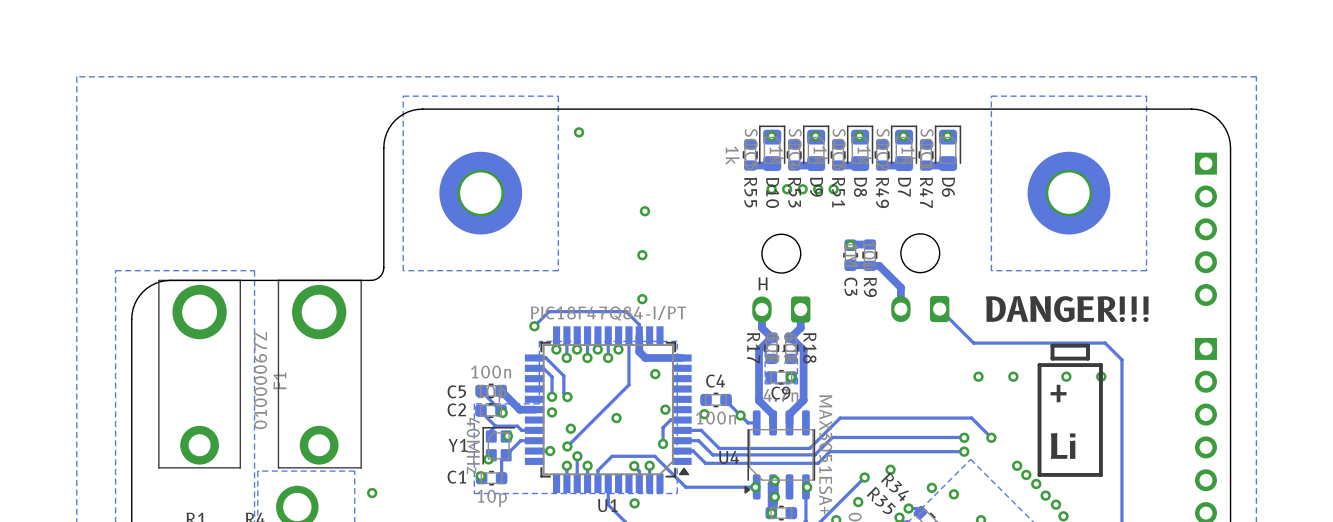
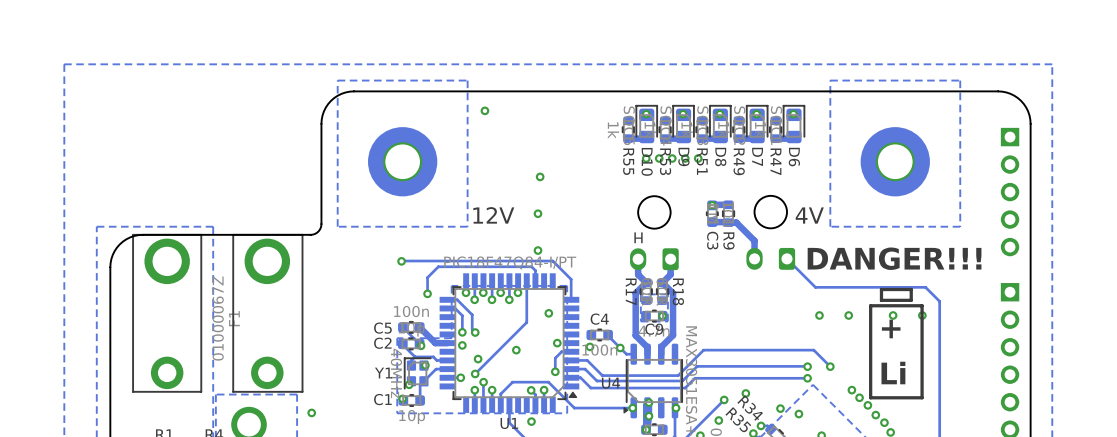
text: none -> 12V (493, 215)
text: none -> 4V (809, 215)
track: (549, 311) (534, 326) -> (459, 261) (401, 261)
track: (626, 311) (639, 324) -> (427, 293) (427, 277) (438, 266) (531, 266) (535, 271)
via: none -> (401, 261)
via: (534, 326) -> none
track: (639, 335) (639, 351) (645, 357) (681, 357) -> (524, 261) (552, 261) (571, 279) (571, 299)
via: none -> (427, 293)

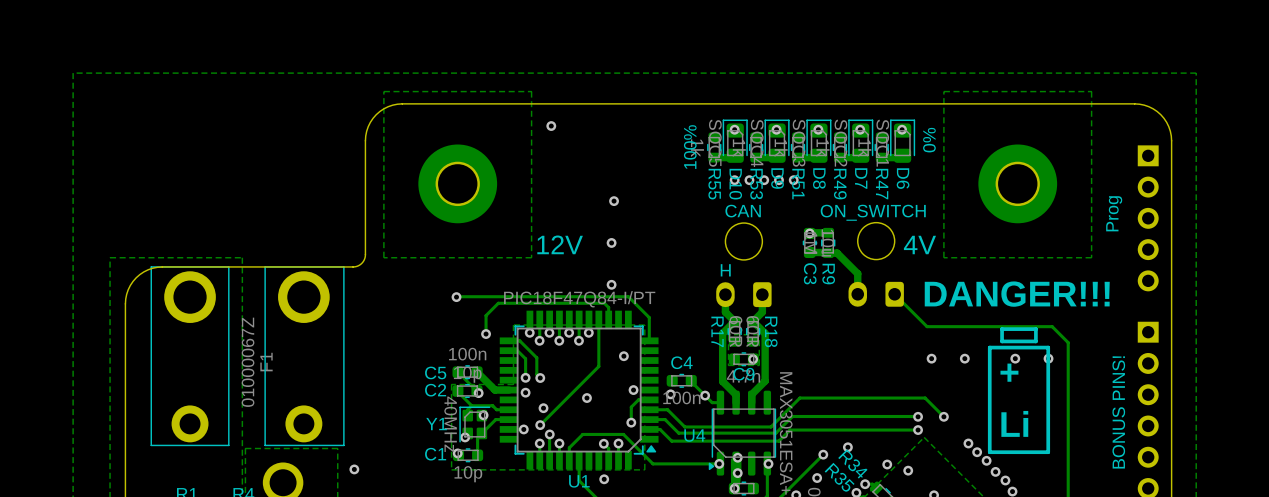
text: none -> 0% (929, 140)
text: none -> 100% (690, 147)
text: none -> CAN (743, 211)
text: none -> ON_SWITCH (873, 212)
text: none -> Prog (1114, 213)
text: none -> BONUS PINS! (1118, 412)

